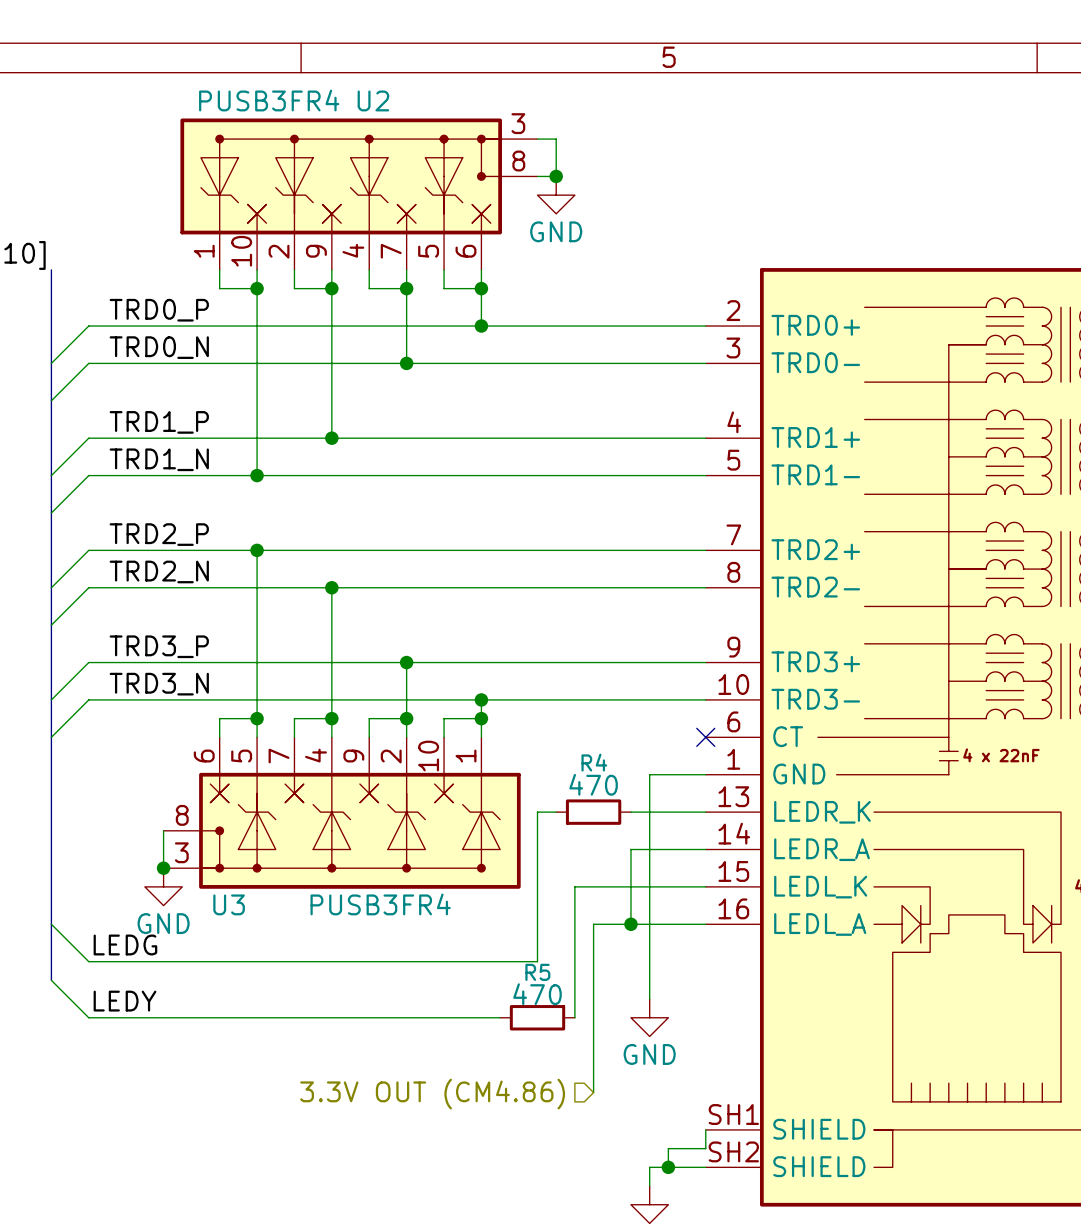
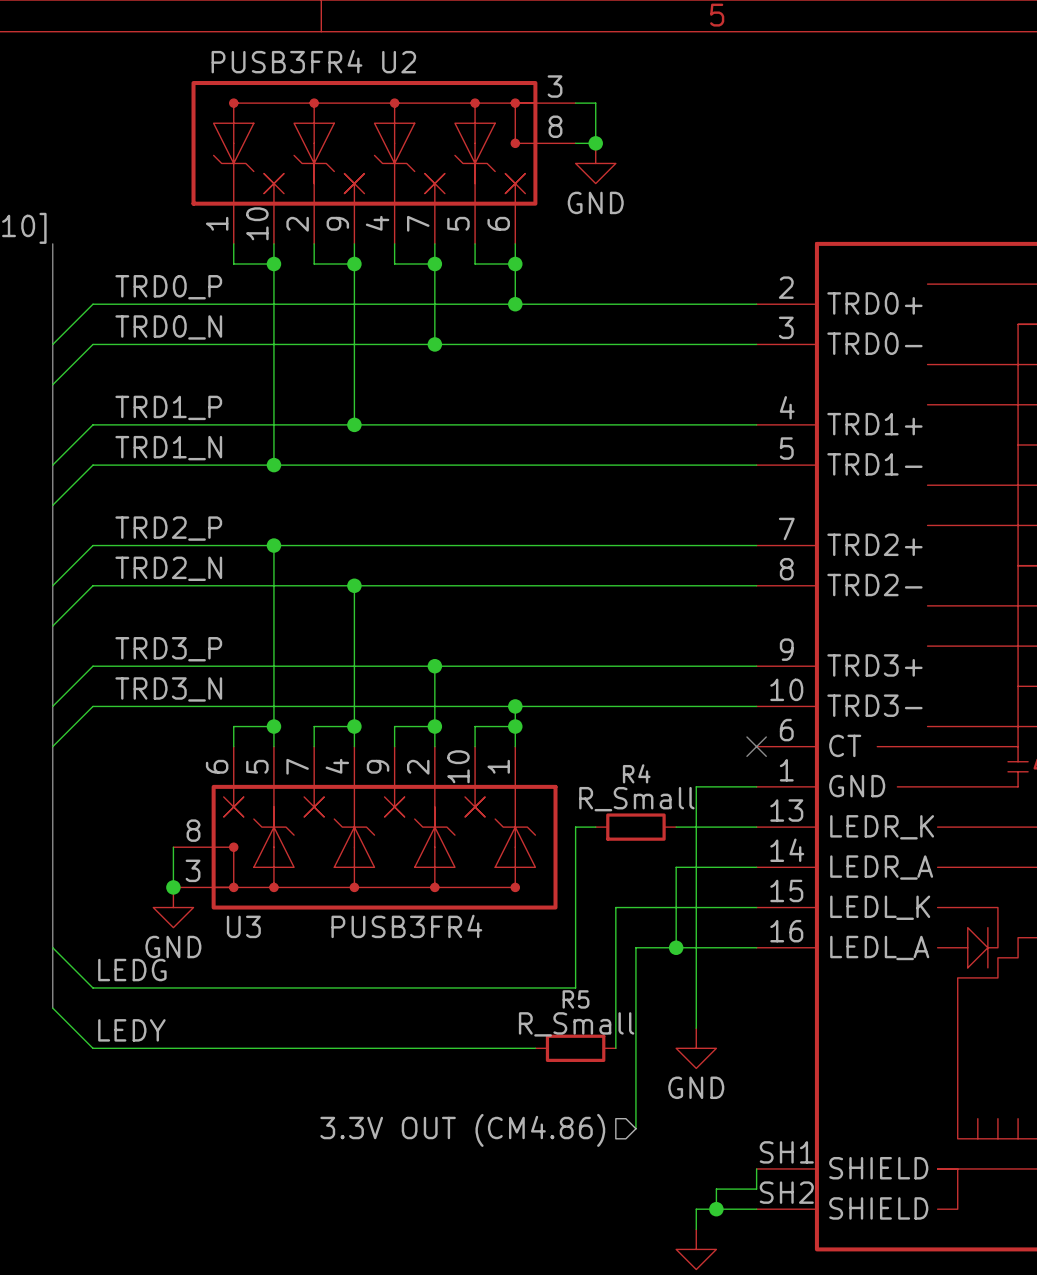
R4 value: 470 (593, 784) -> R_Small (636, 799)
R5 value: 470 (537, 994) -> R_Small (576, 1024)

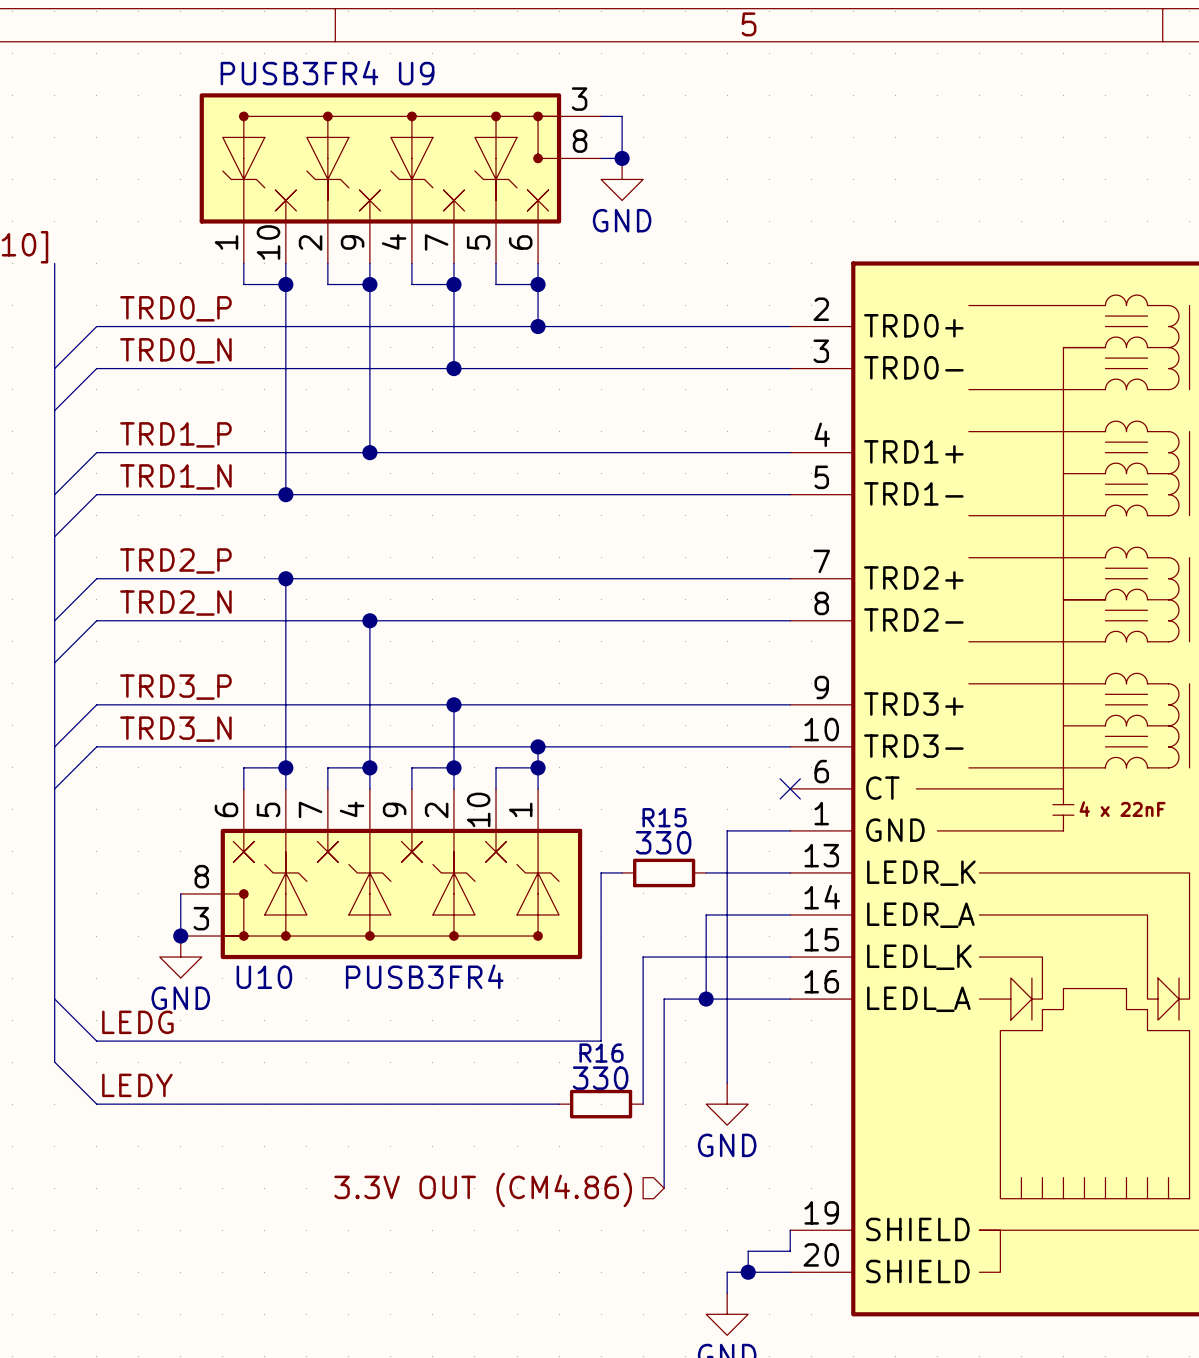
U2 name: U2 (399, 62) -> U9 (416, 73)
R4 name: R4 (636, 773) -> R15 (664, 817)
R4 value: R_Small (636, 799) -> 330 (663, 842)
U3 name: U3 (243, 926) -> U10 (264, 977)
R5 name: R5 (576, 999) -> R16 (601, 1053)
R5 value: R_Small (576, 1024) -> 330 (600, 1078)
part pin number: SH1 (786, 1152) -> 19 (821, 1212)
part pin number: SH2 (786, 1192) -> 20 (821, 1254)

